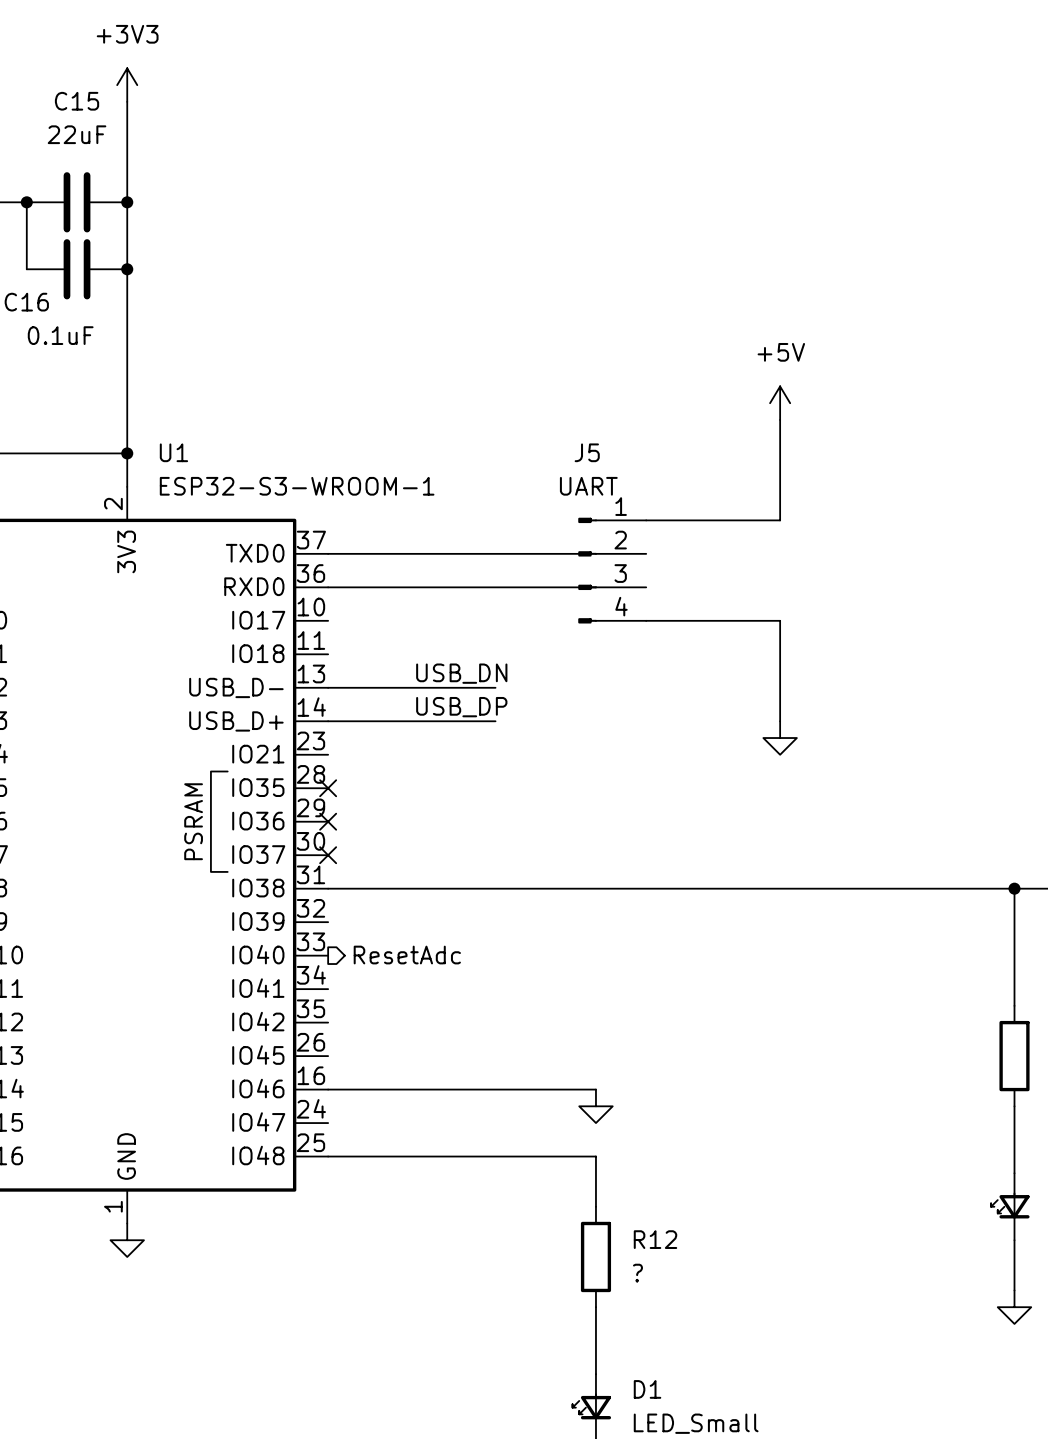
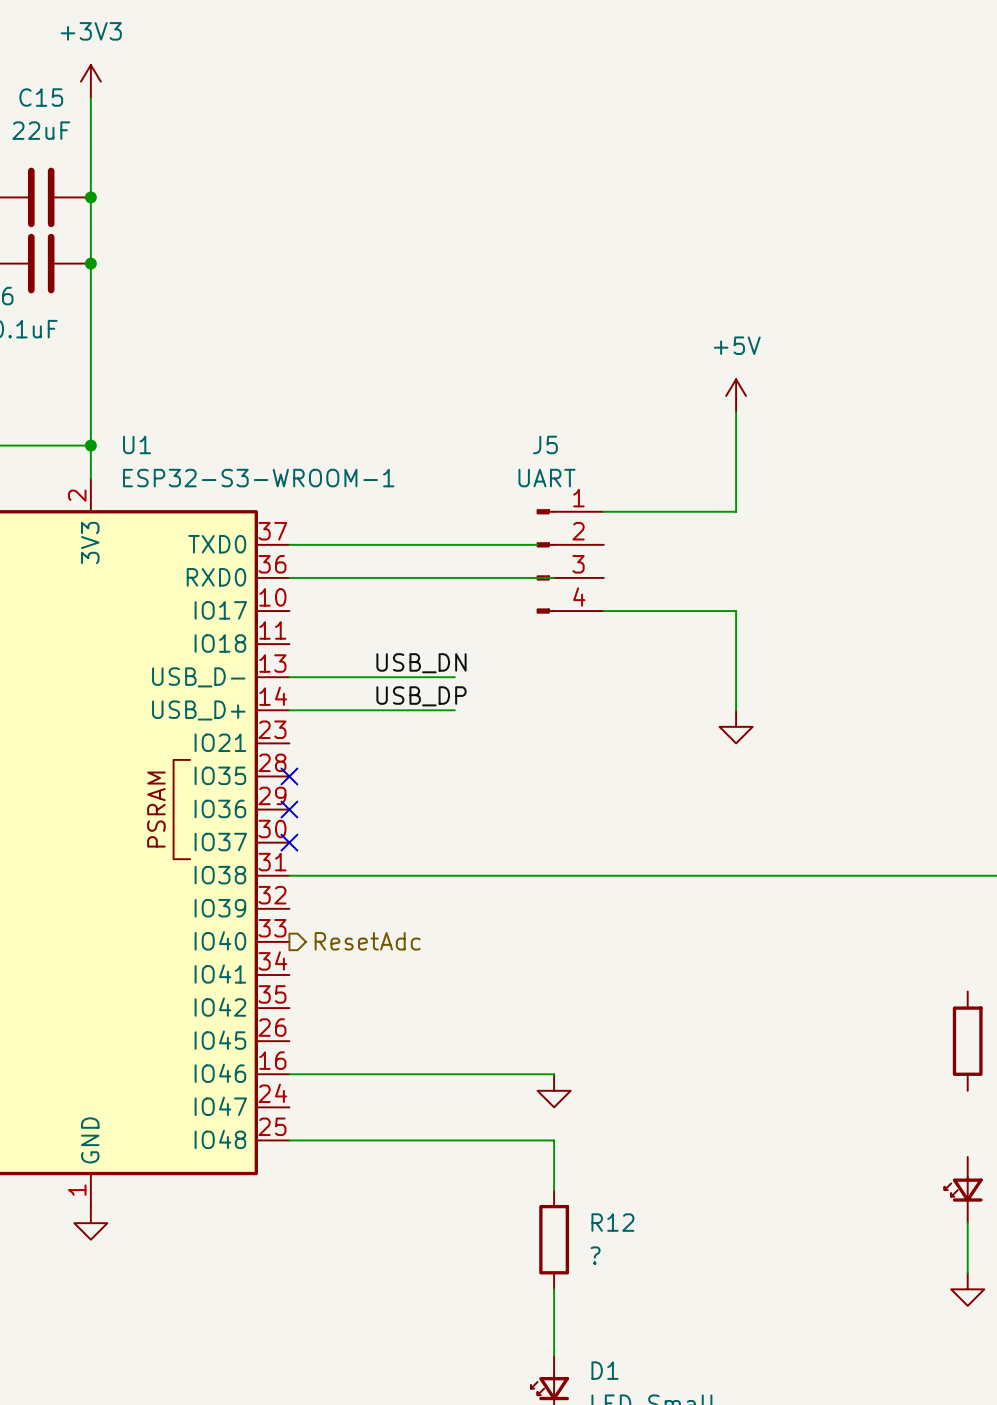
wire: (1014, 888) (1014, 1005) -> none
junction: (1014, 888) -> none
wire: (1014, 1106) (1014, 1173) -> none

